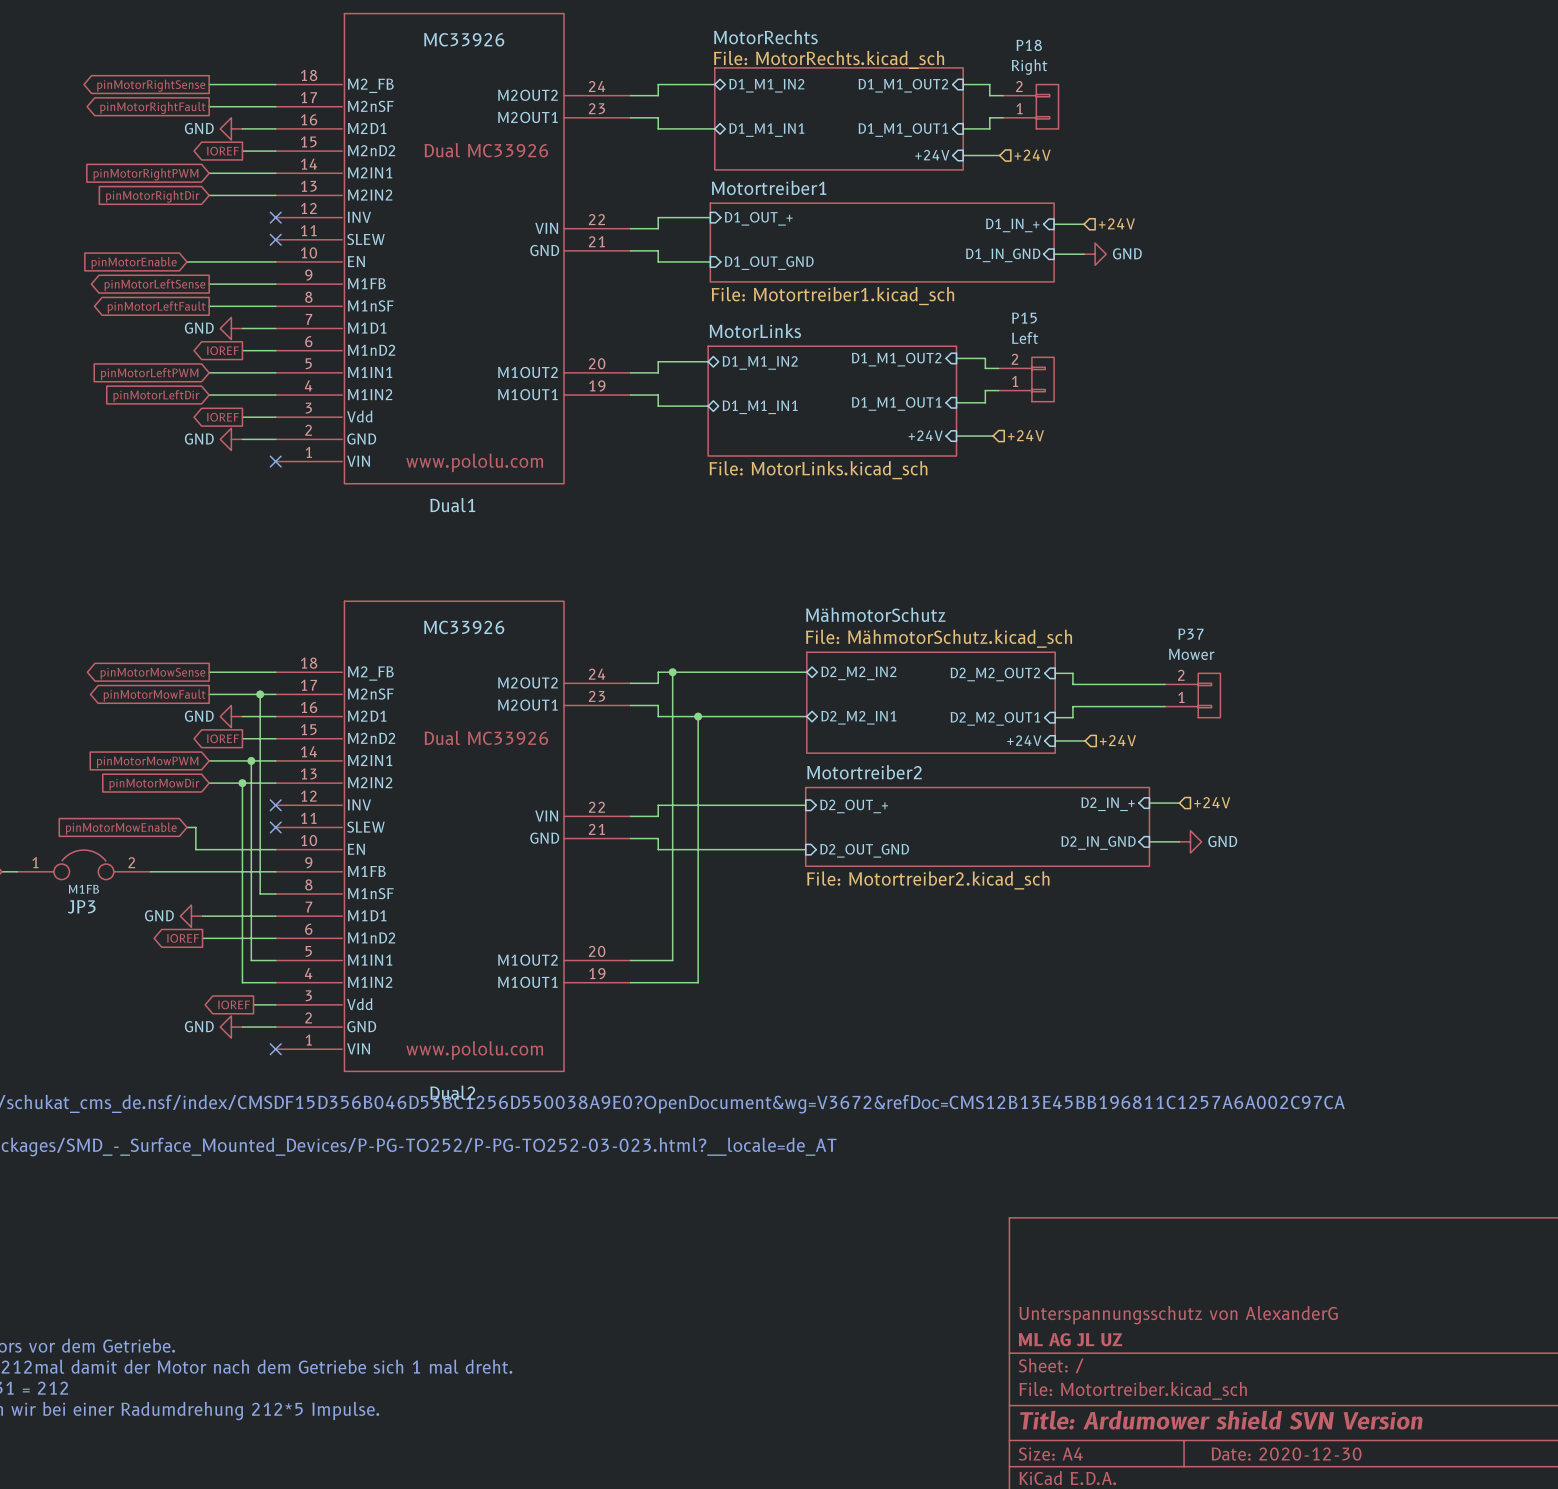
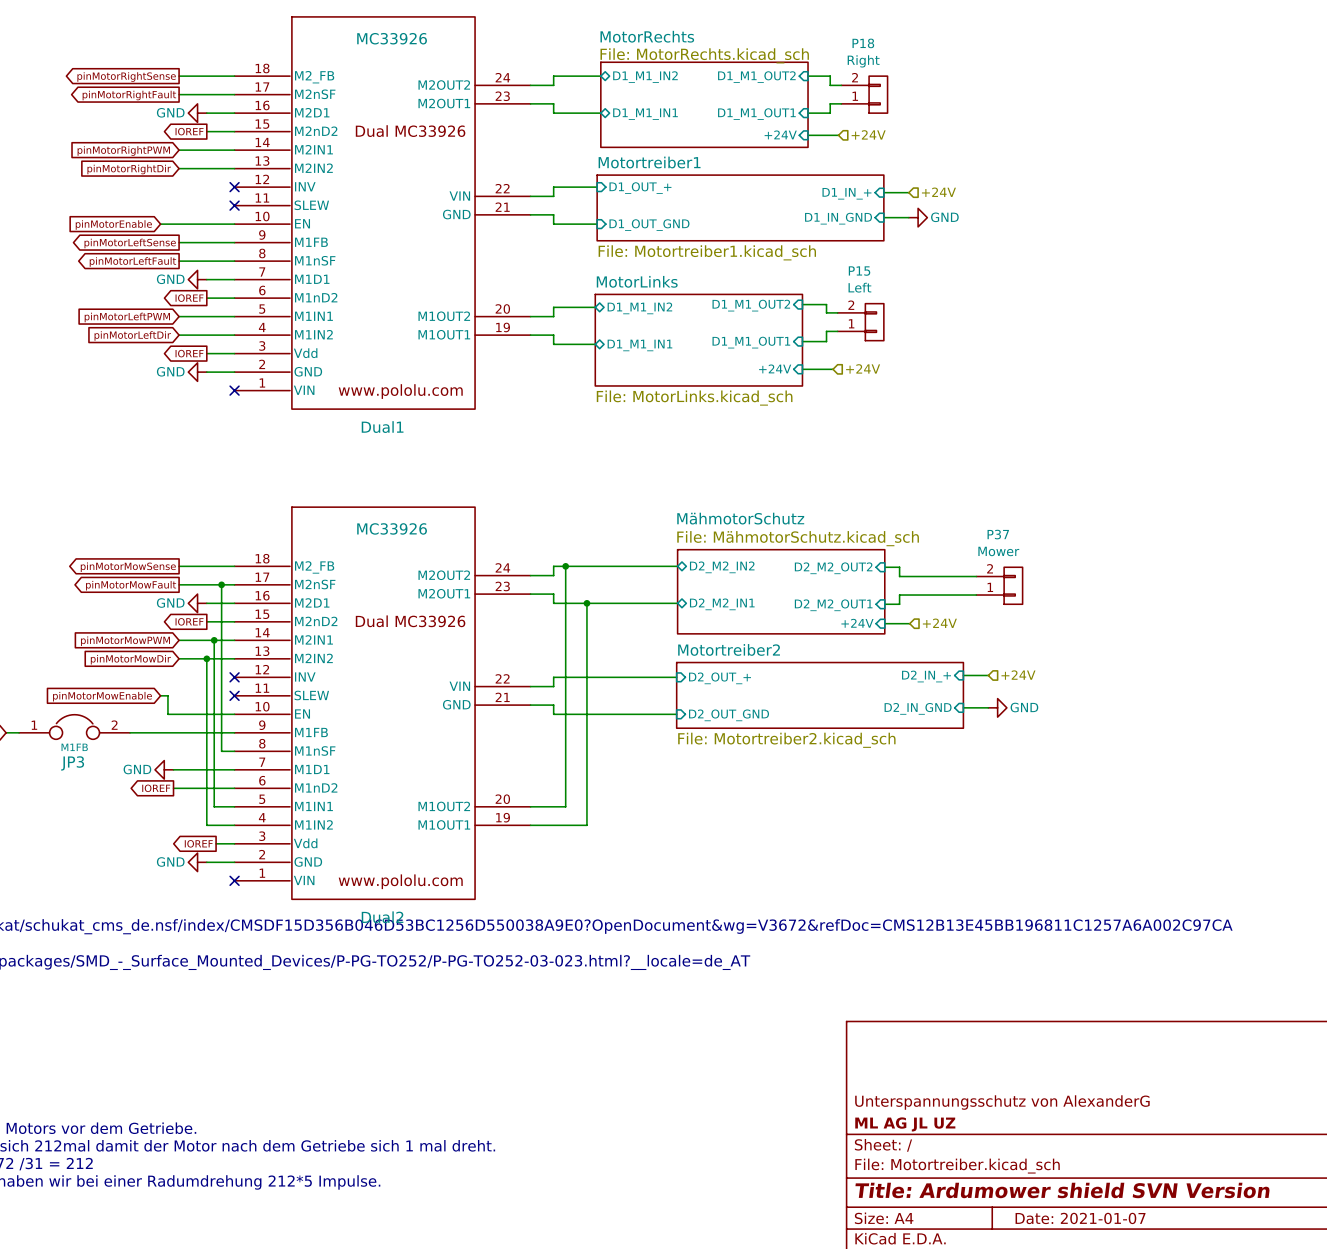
title block: Date: 2020-12-30 (1286, 1454) -> Date: 2021-01-07 (1080, 1218)

